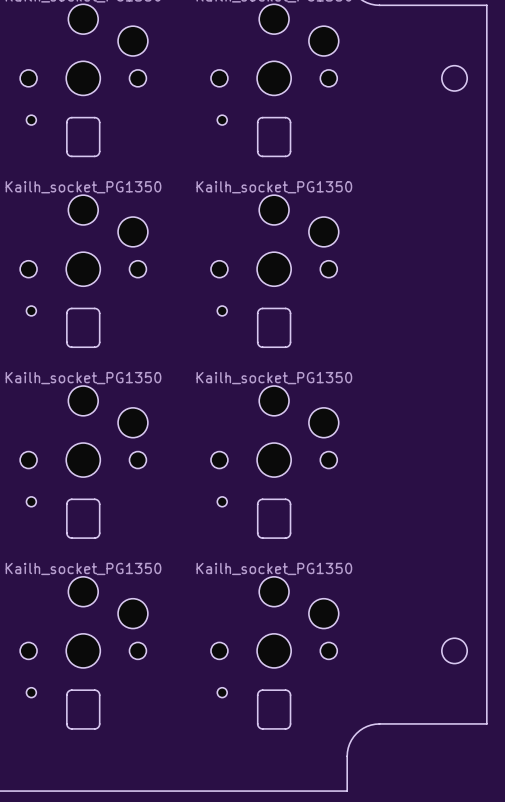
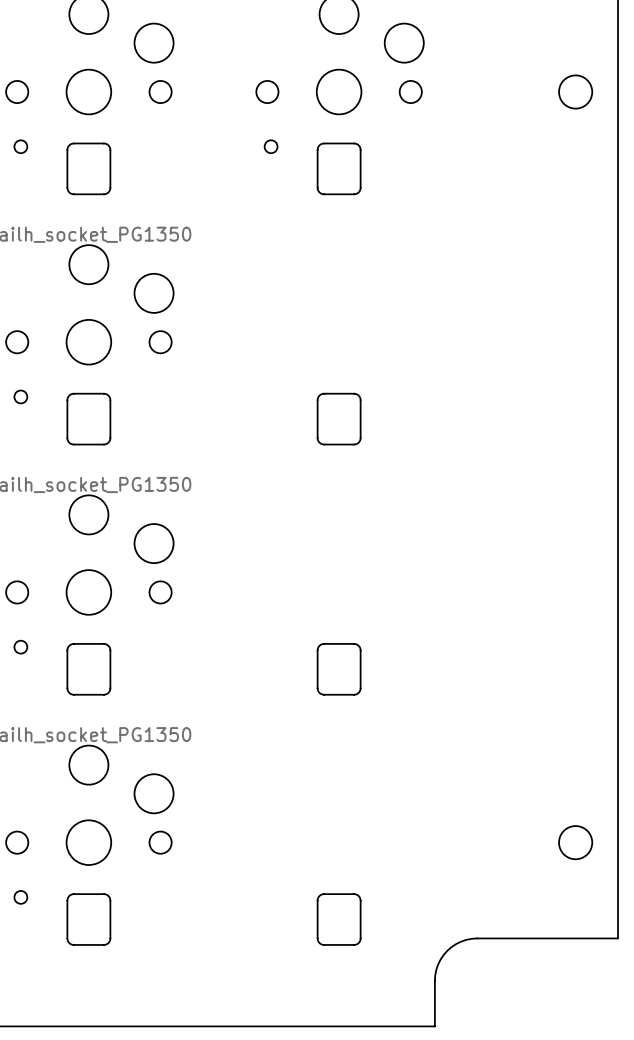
part: Kailh_socket_PG1350 (274, 255) -> none
part: Kailh_socket_PG1350 (274, 446) -> none
part: Kailh_socket_PG1350 (274, 637) -> none

